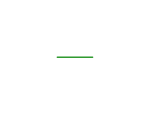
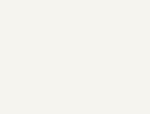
wire: (57, 57) (92, 57) -> none

